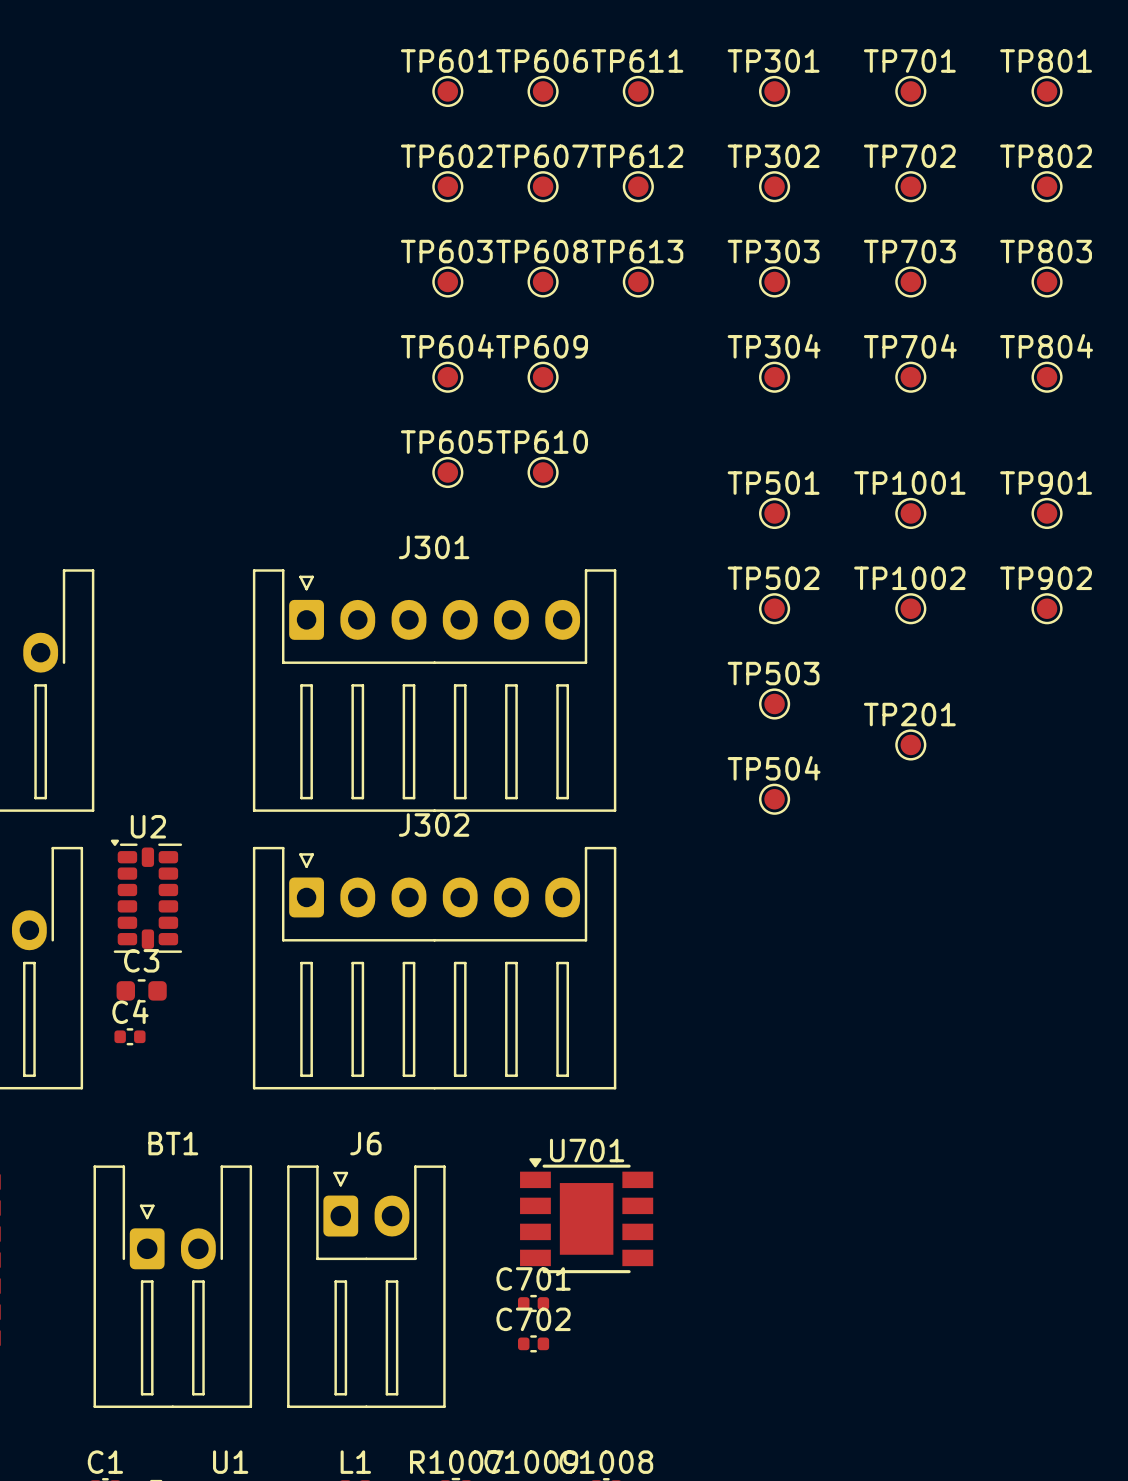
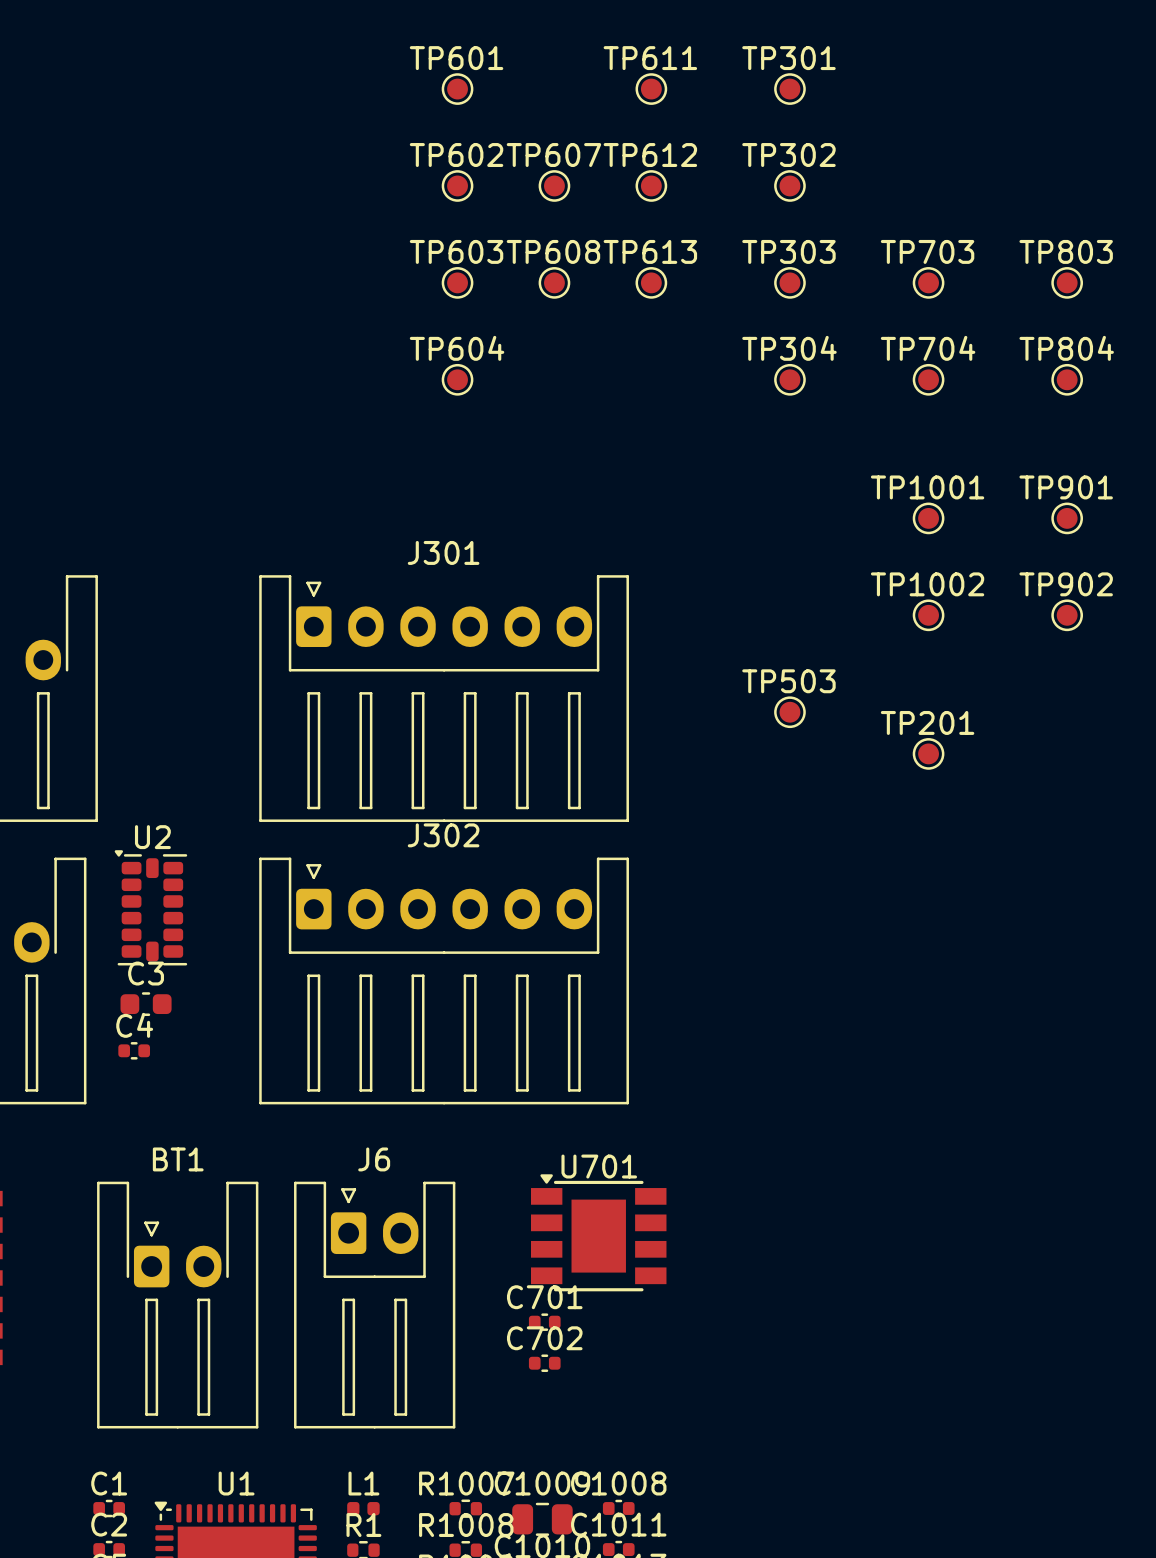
TP606: (543, 91) -> none
TP701: (910, 91) -> none
TP801: (1047, 91) -> none
TP702: (910, 186) -> none
TP802: (1047, 186) -> none
TP609: (543, 377) -> none
TP605: (447, 472) -> none
TP610: (543, 472) -> none
TP501: (774, 513) -> none
TP502: (774, 608) -> none
TP504: (774, 799) -> none

